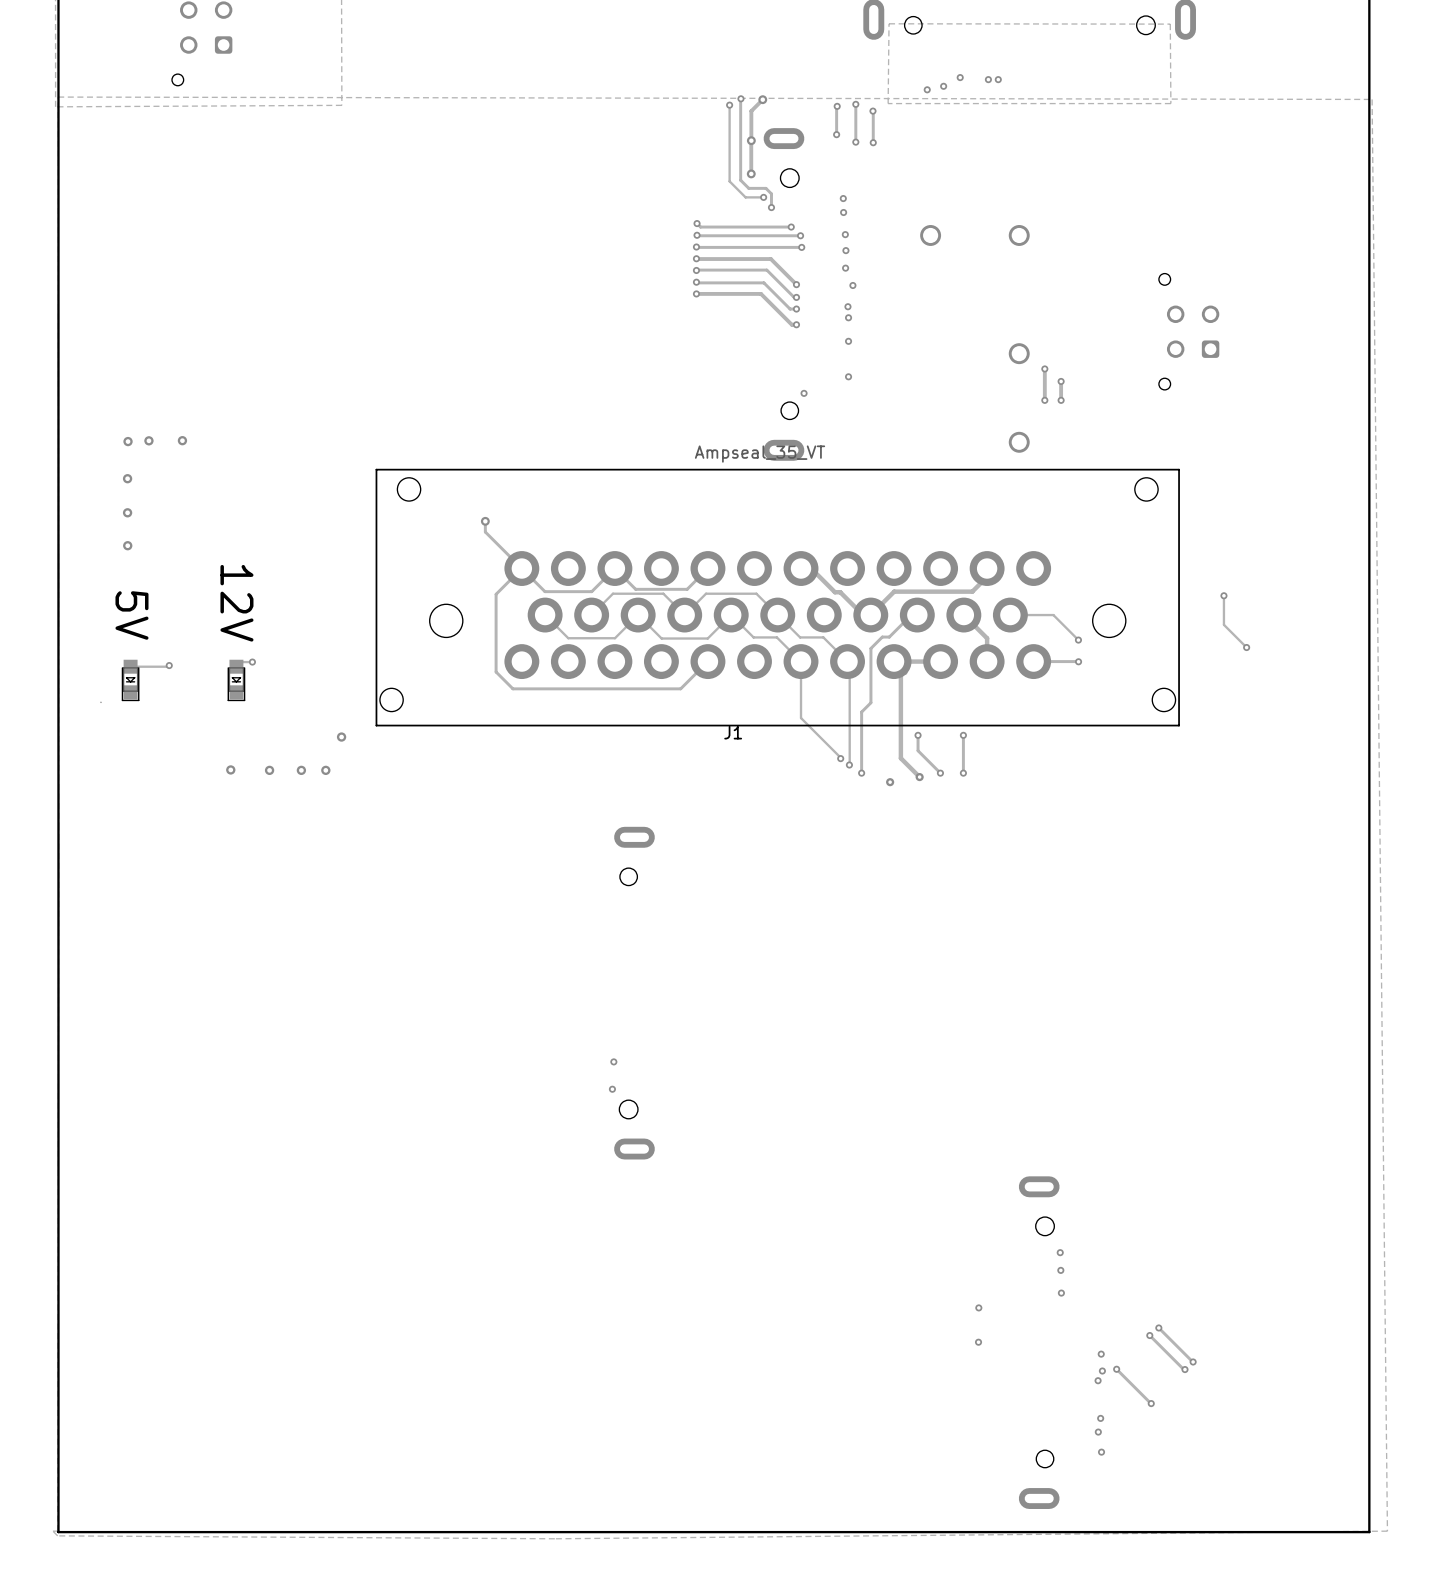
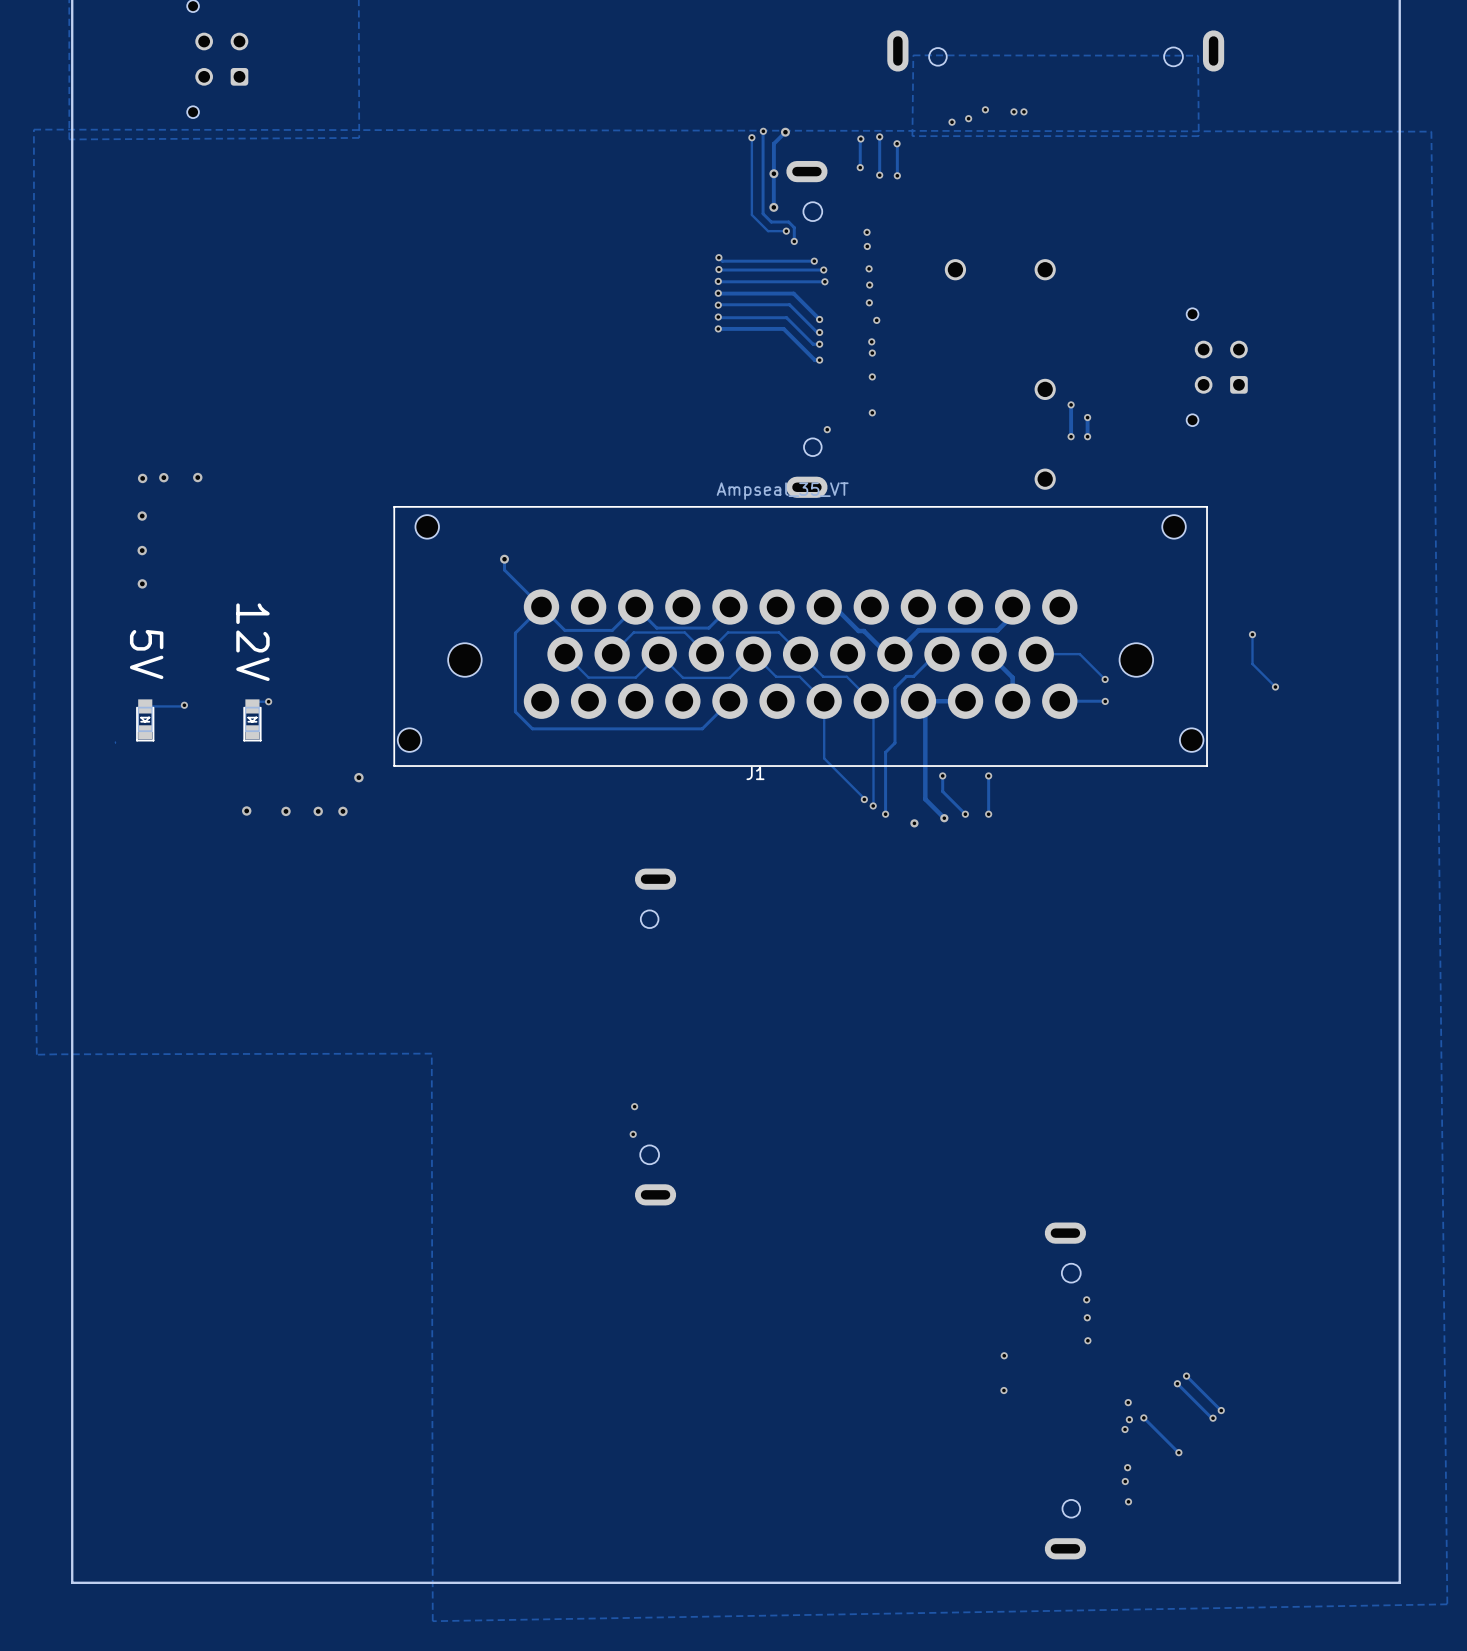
zone outline: (58, 97) (57, 1531) (52, 1531) (57, 1535) (554, 1538) (1387, 1531) (1372, 99) (58, 97) -> (33, 129) (34, 870) (36, 1054) (431, 1053) (432, 1621) (1447, 1604) (1431, 131) (33, 129)

